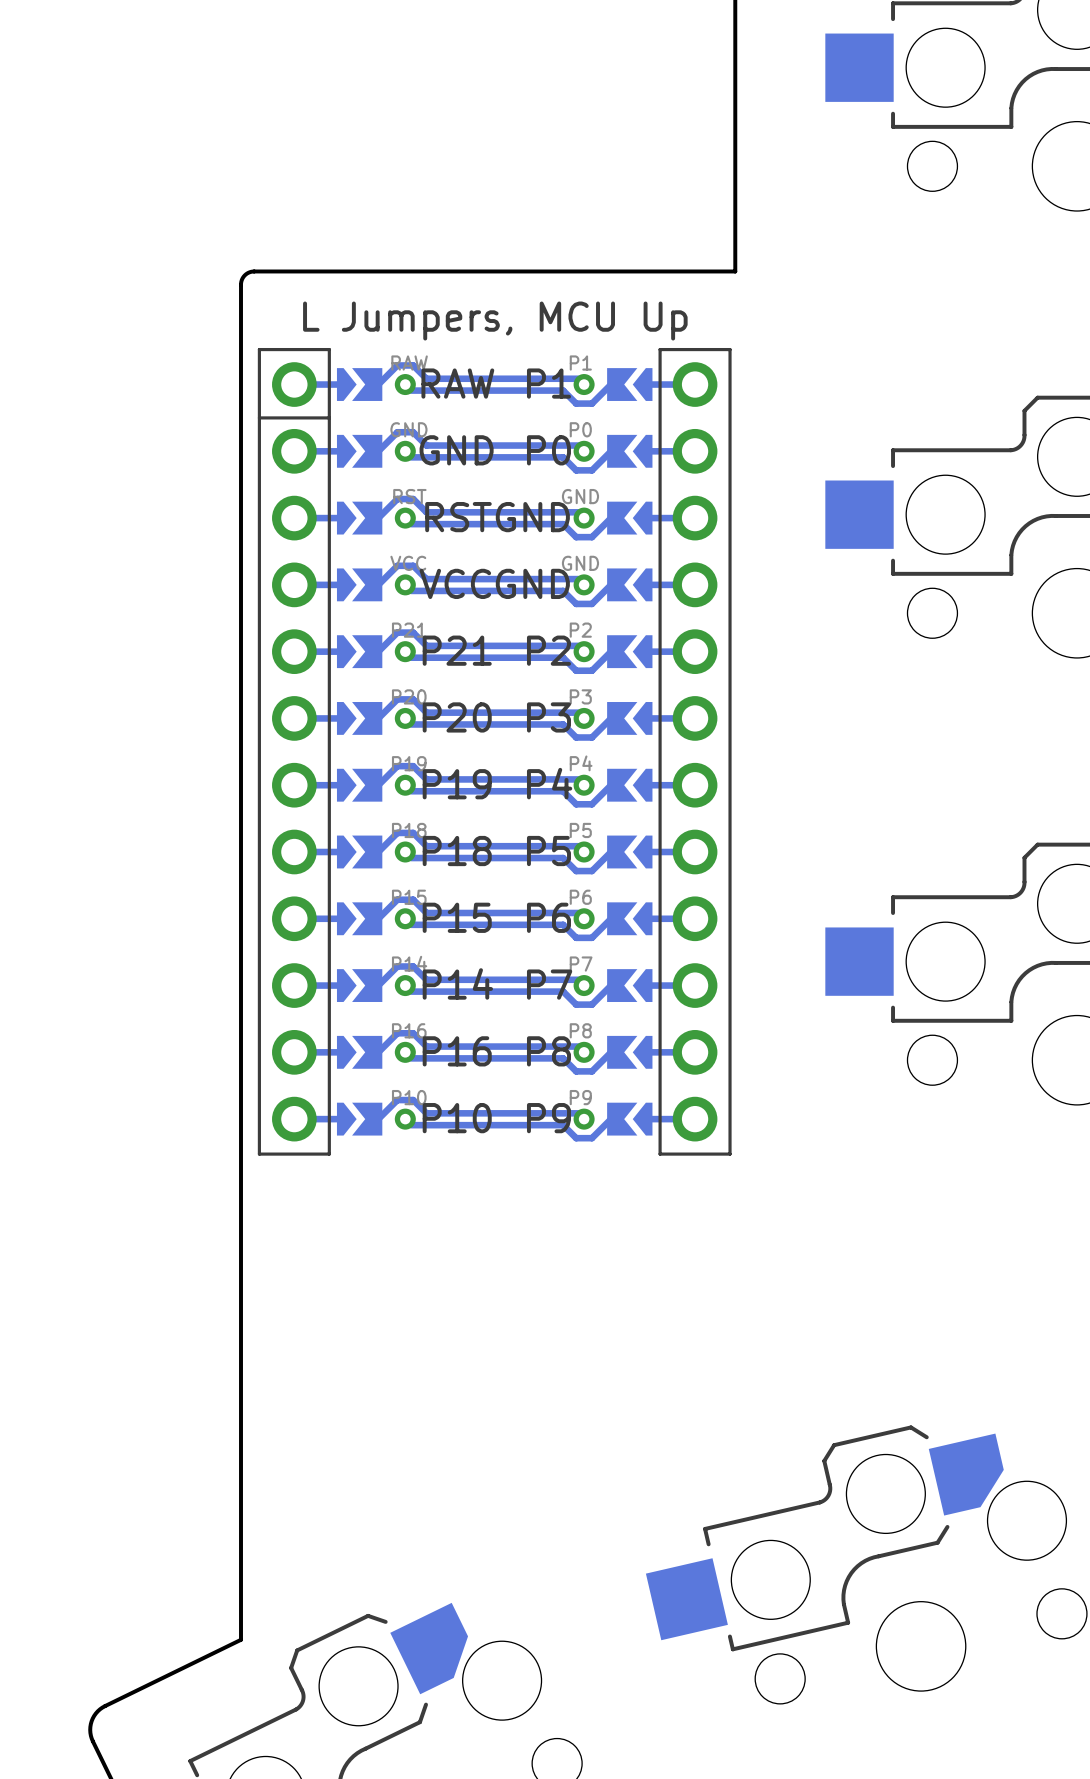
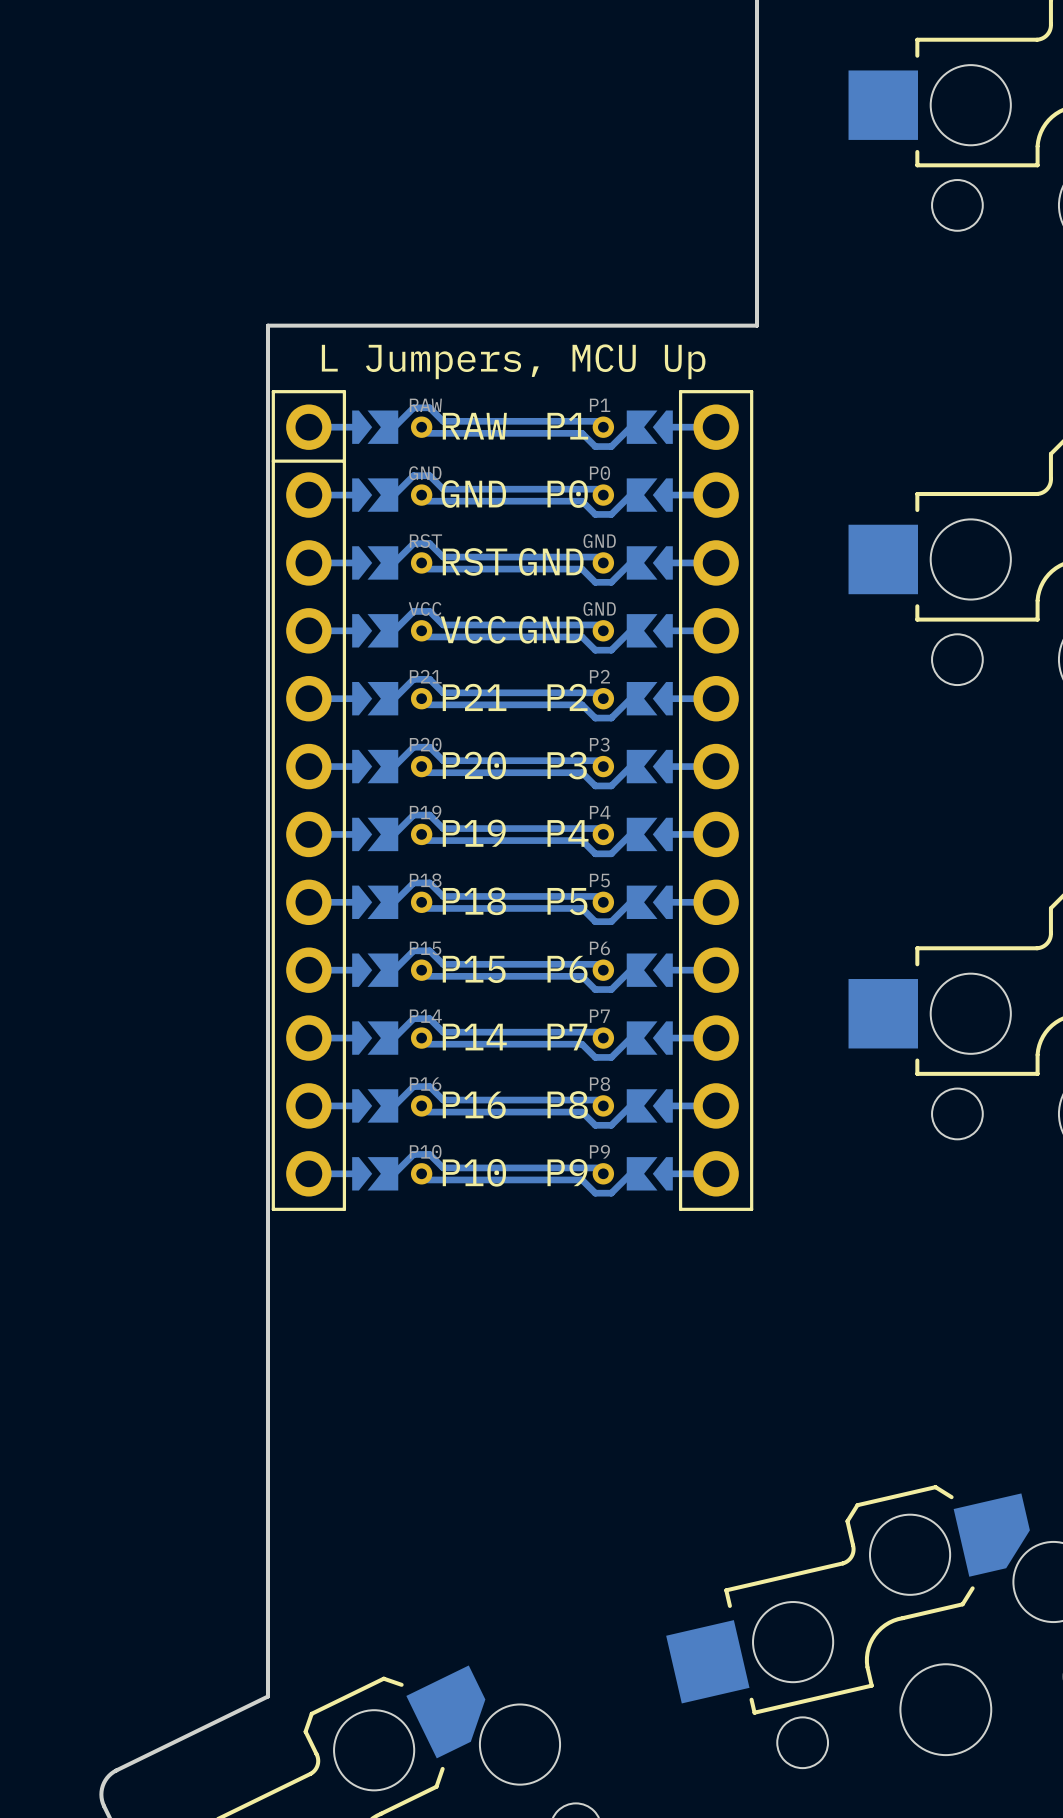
board edge: (735, 271) (254, 271) (247, 273) (241, 280) (241, 1639) -> (757, 312) (757, 325) (267, 325) (267, 1696) (254, 1703)

